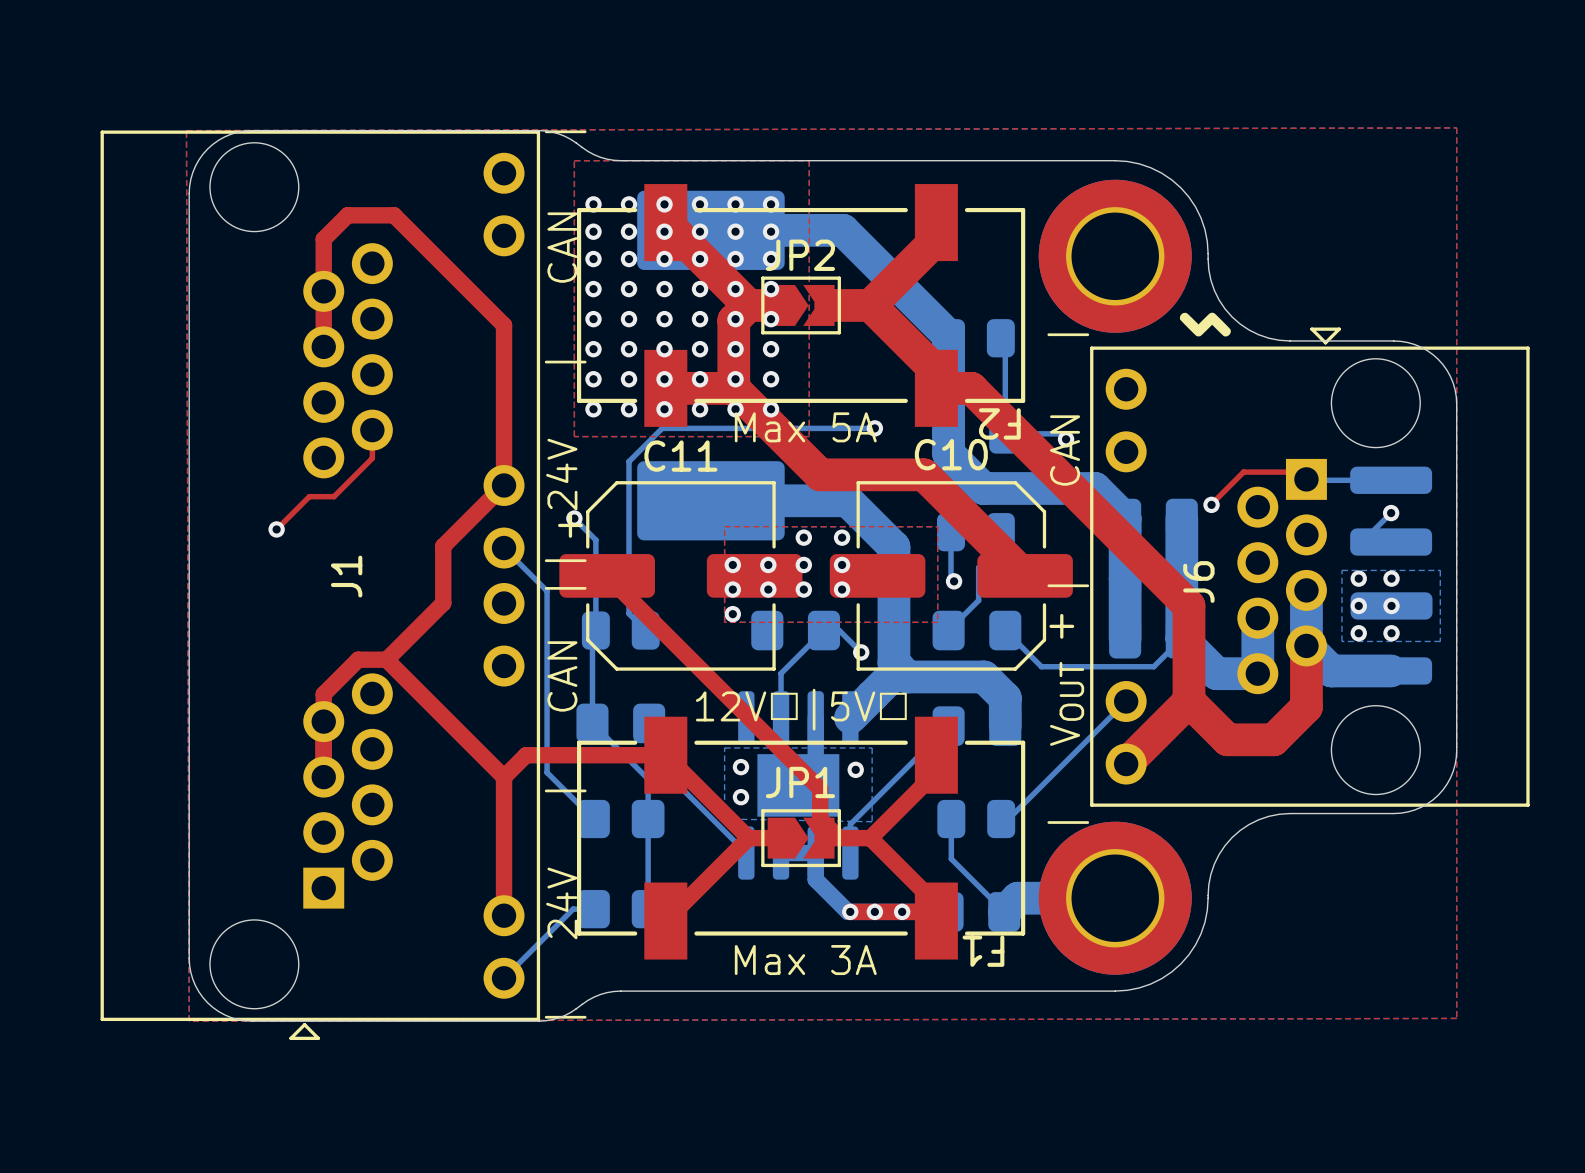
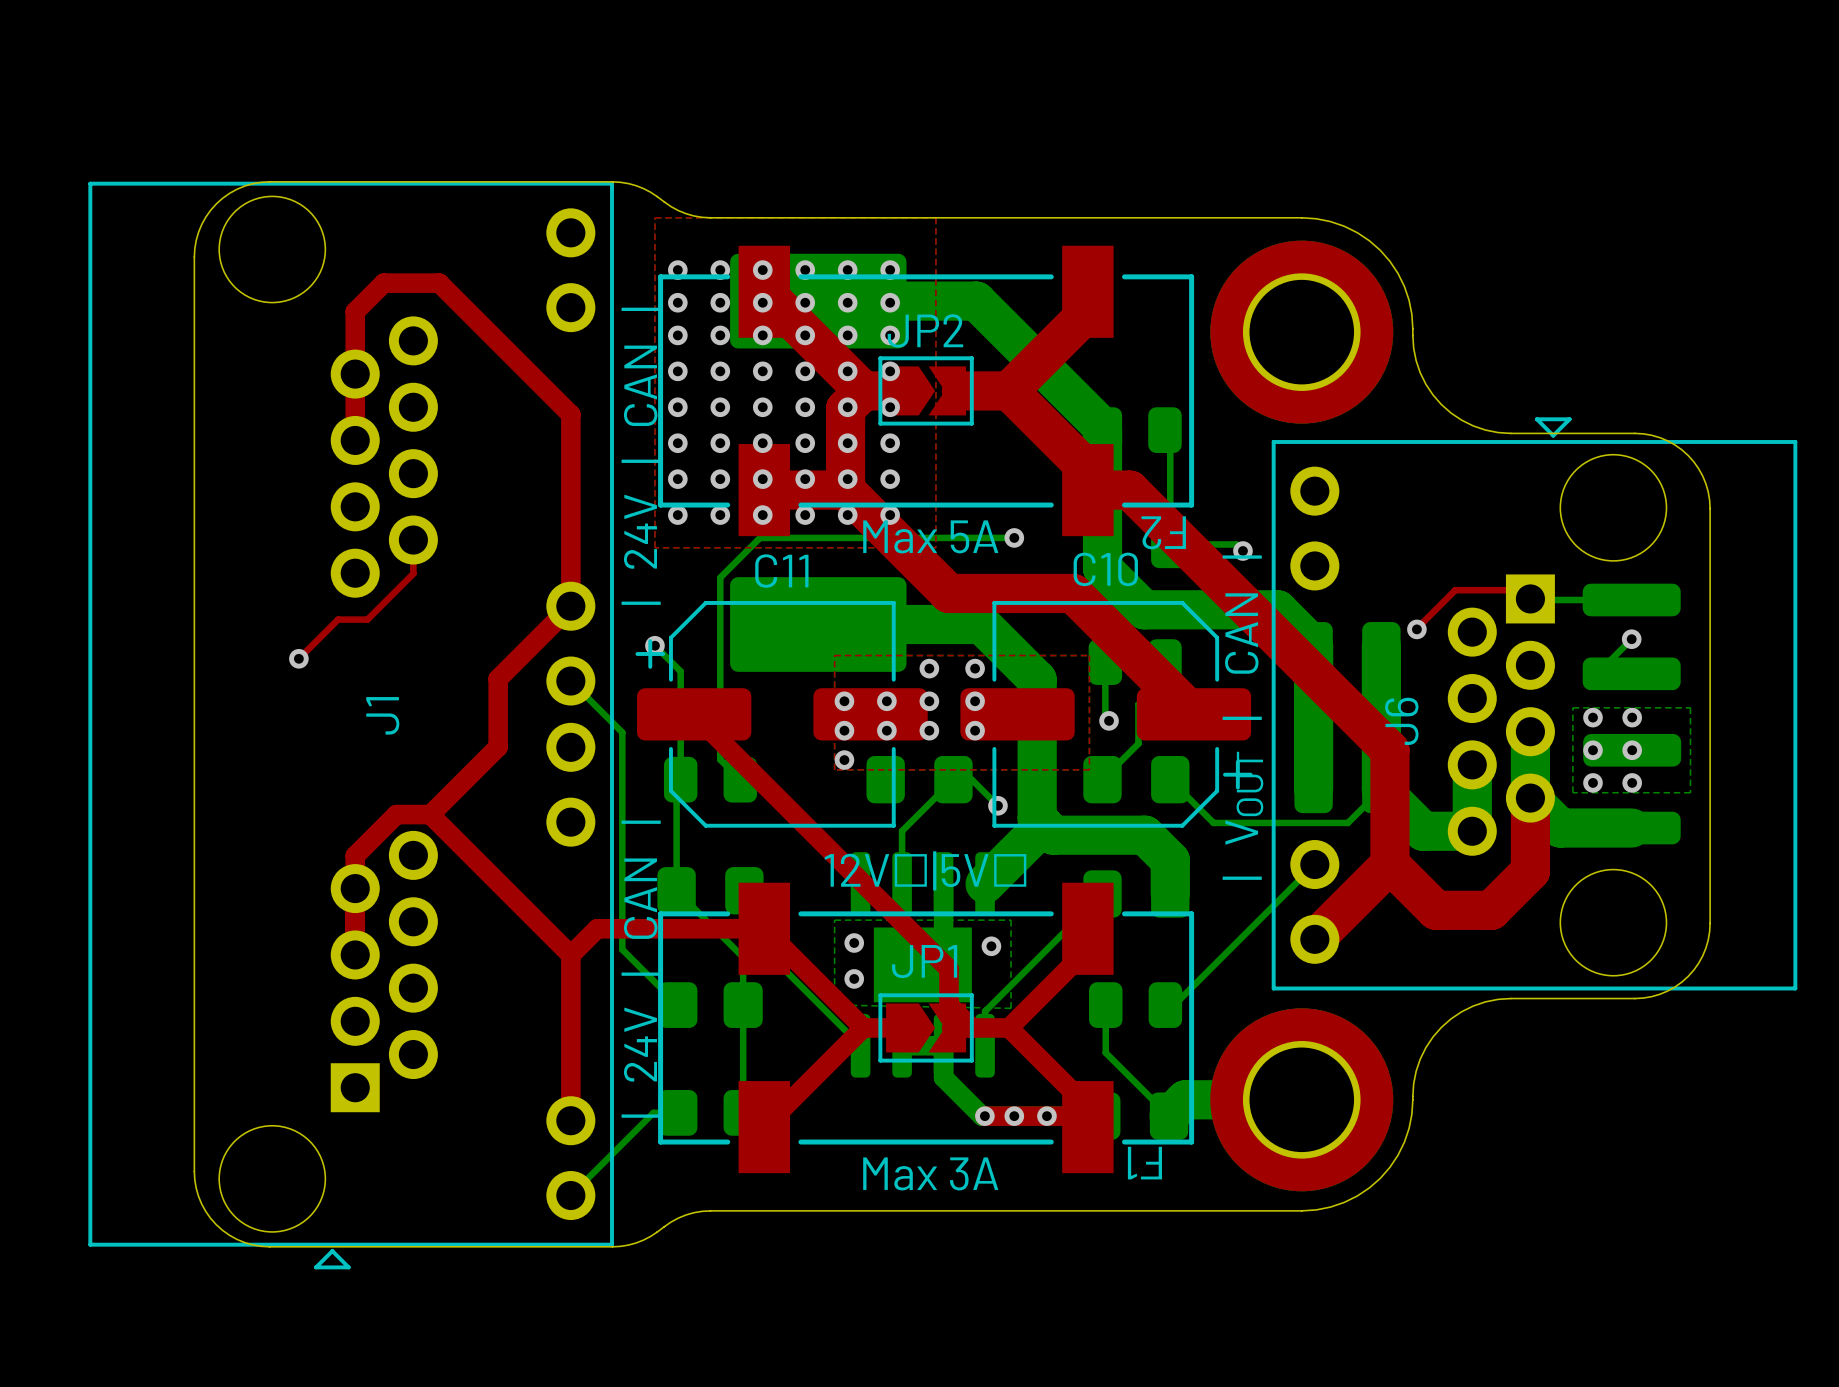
top zone outline: (1456, 127) (186, 130) (189, 1021) (1456, 1018) (1456, 127) -> none
drawing: [1179, 312, 1231, 337] -> none

